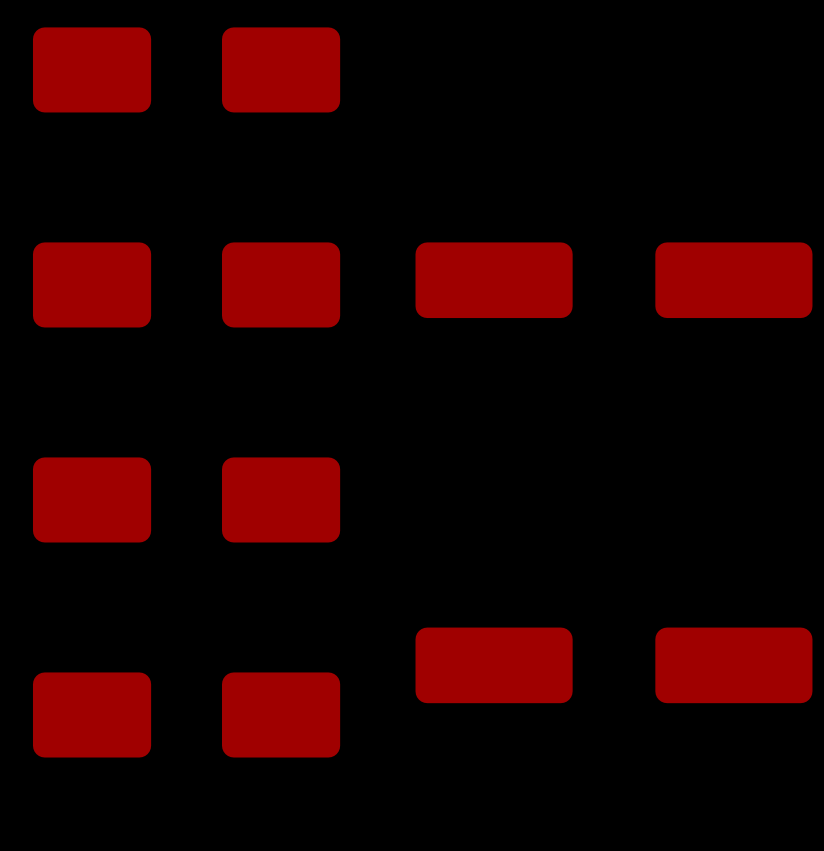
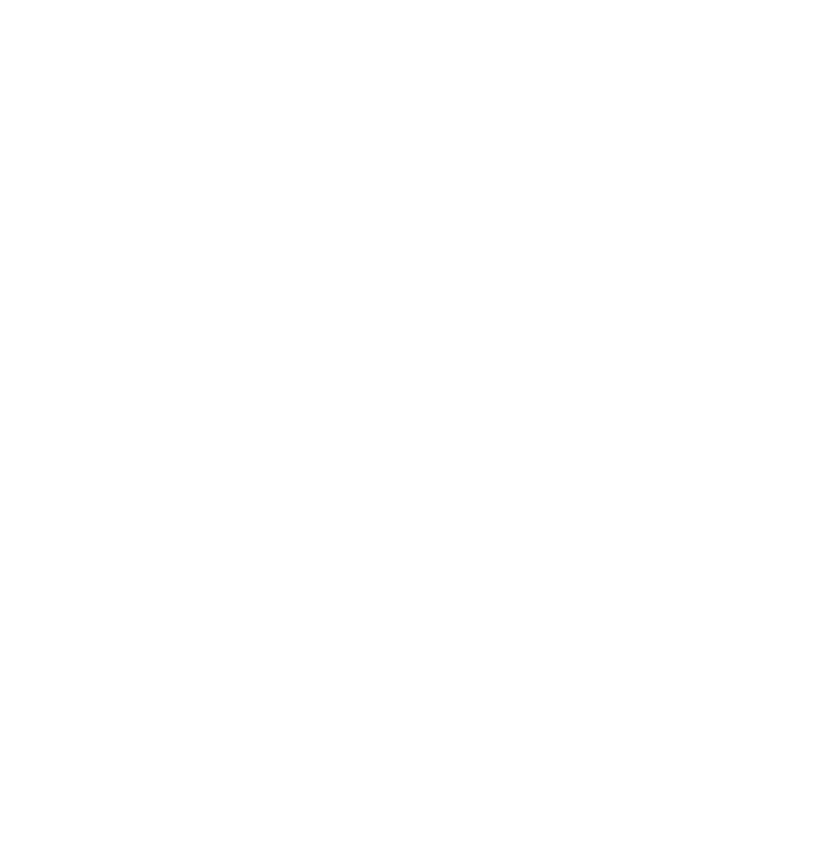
part: (186, 69) -> none
part: (613, 280) -> none
part: (186, 284) -> none
part: (186, 499) -> none
part: (613, 665) -> none
part: (186, 714) -> none

